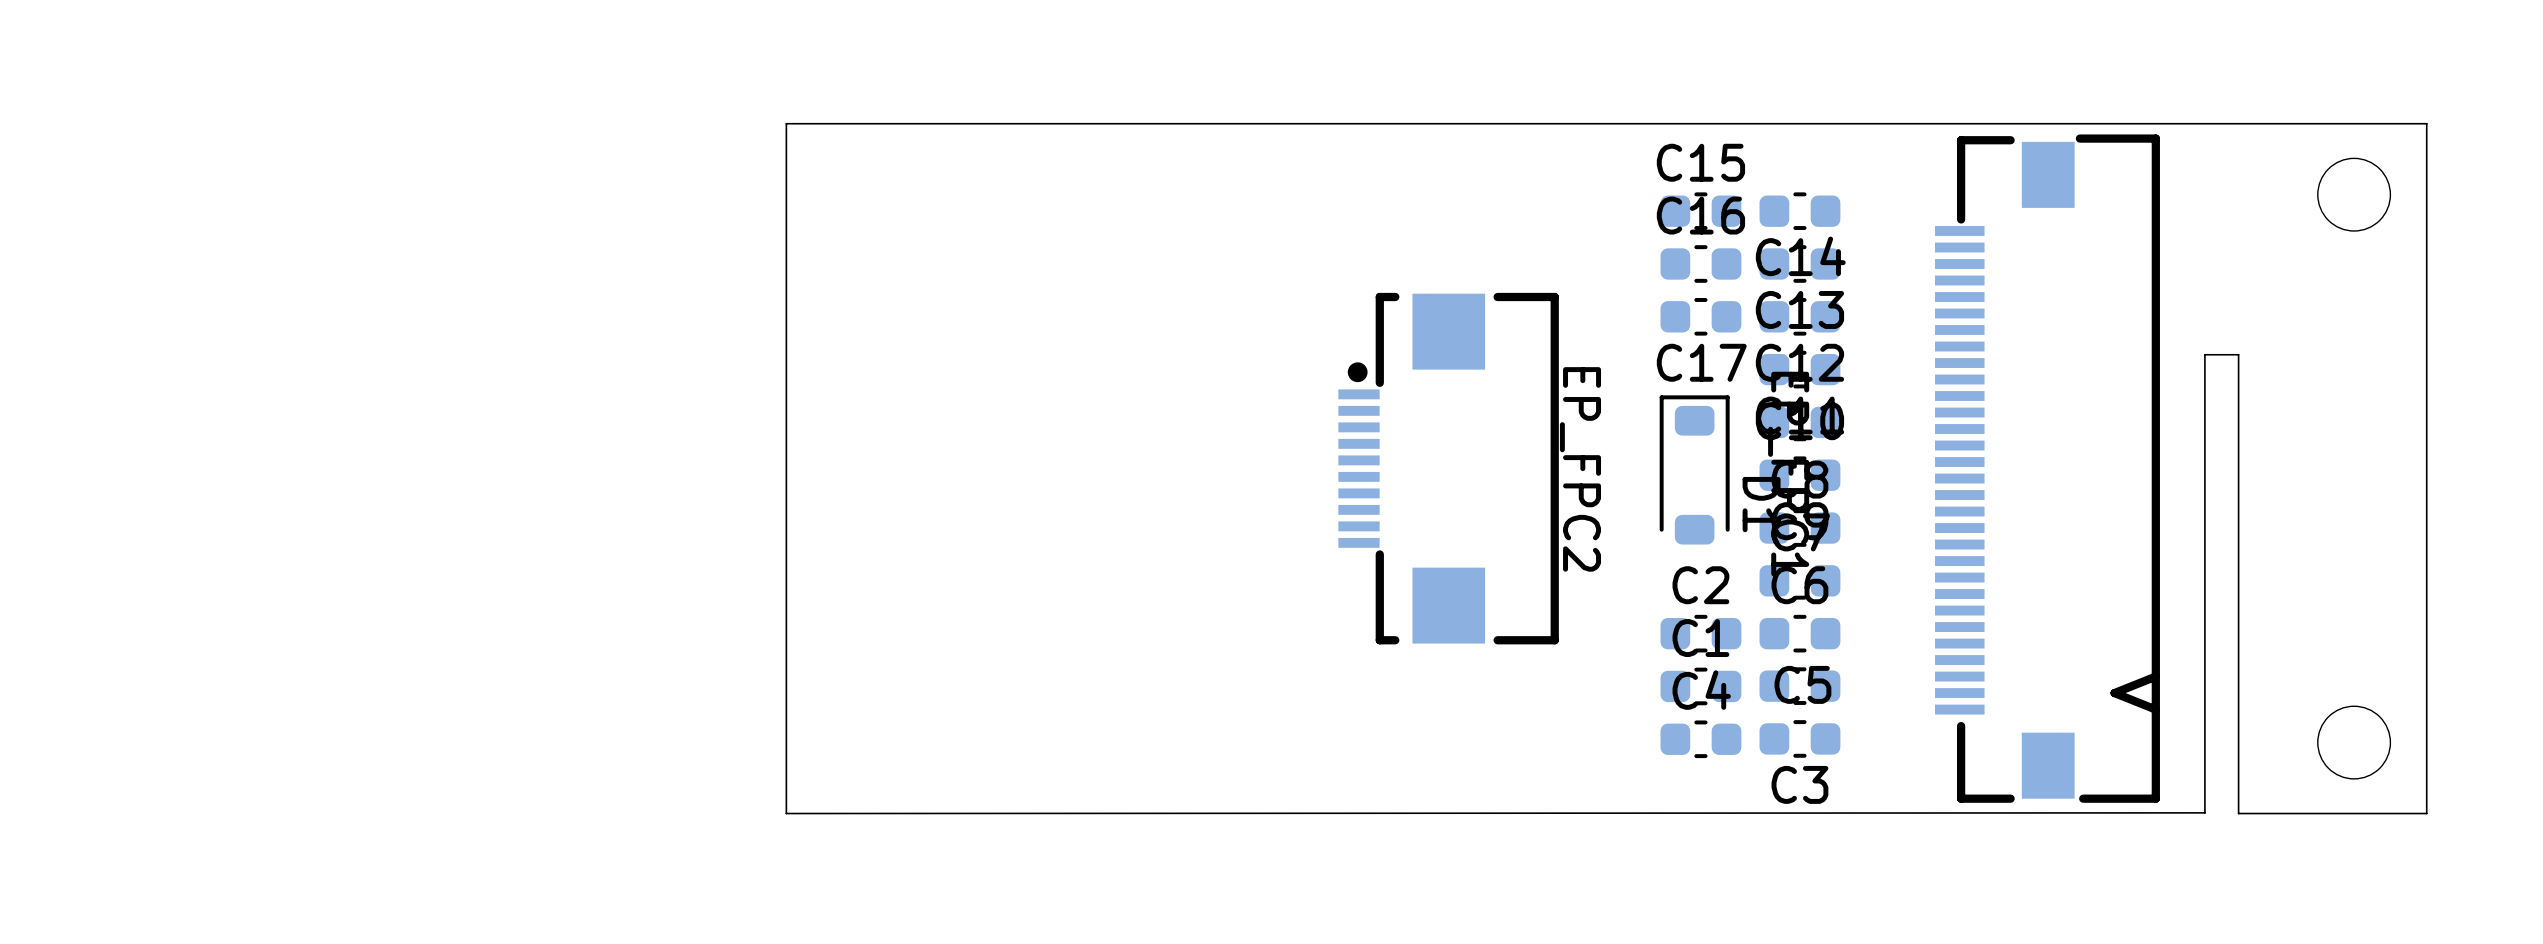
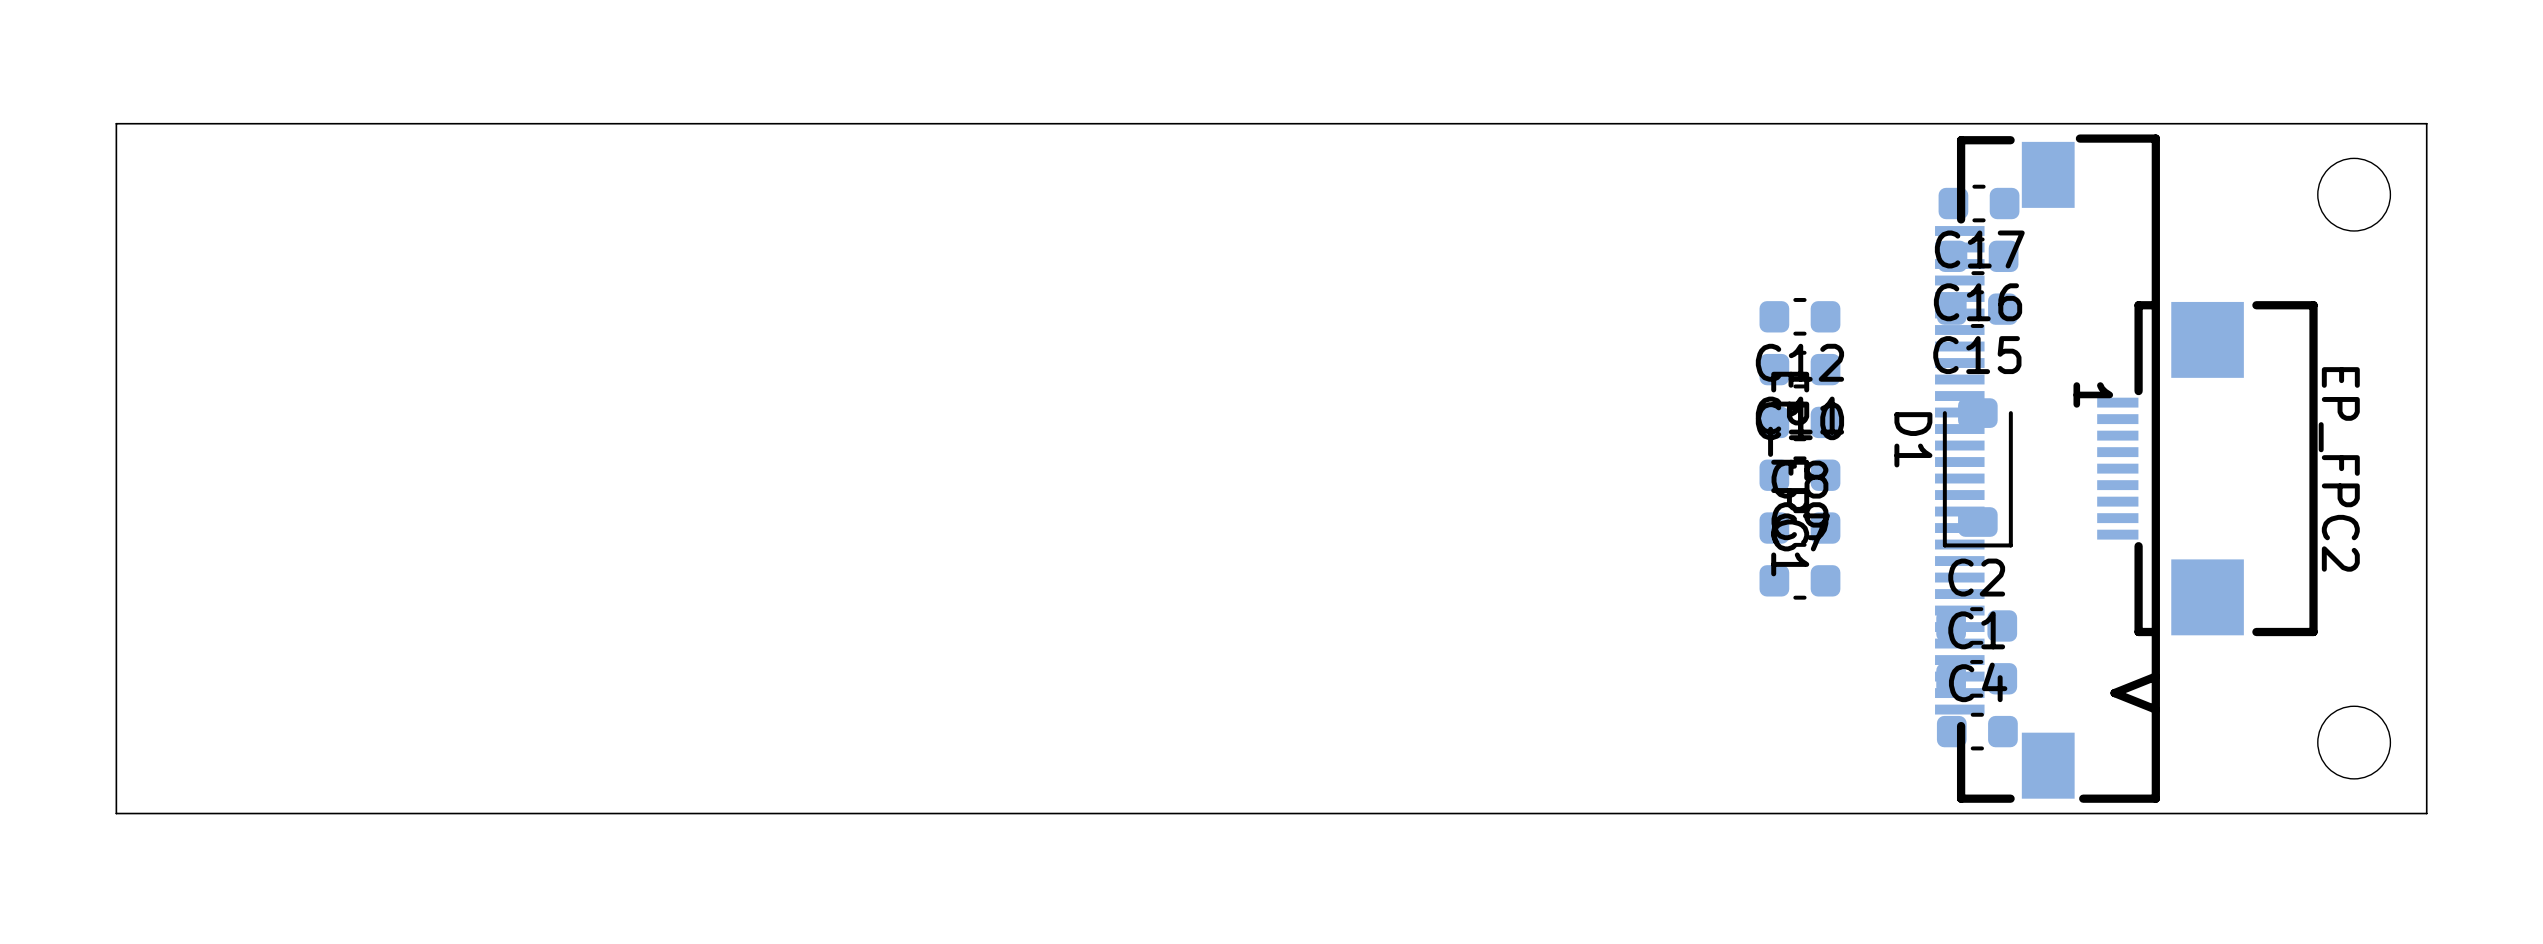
board edge: (786, 123) (786, 813) (2204, 812) (2204, 354) (2238, 354) (2238, 813) -> (786, 123) (116, 123) (116, 813) (2238, 813)
C15 name position: C15 (1700, 162) -> C15 (1977, 355)
C15 position: (1700, 211) -> (1977, 309)
C14: (1799, 211) -> none
C16 name position: C16 (1700, 215) -> C16 (1978, 302)
C16 position: (1700, 263) -> (1978, 256)
C13: (1799, 263) -> none
EP_FPC2 footprint: [1338, 292, 1559, 645] -> [2097, 301, 2318, 637]
C17 position: (1700, 316) -> (1979, 203)
D1 rotation: 0° (1694, 469) -> 180° (1977, 472)
D1 position: (1694, 469) -> (1977, 472)
C2 position: (1700, 633) -> (1976, 625)
C6: (1799, 633) -> none
C1 position: (1700, 686) -> (1976, 678)
C5: (1799, 686) -> none
C3: (1799, 738) -> none
C4 position: (1700, 739) -> (1977, 731)

